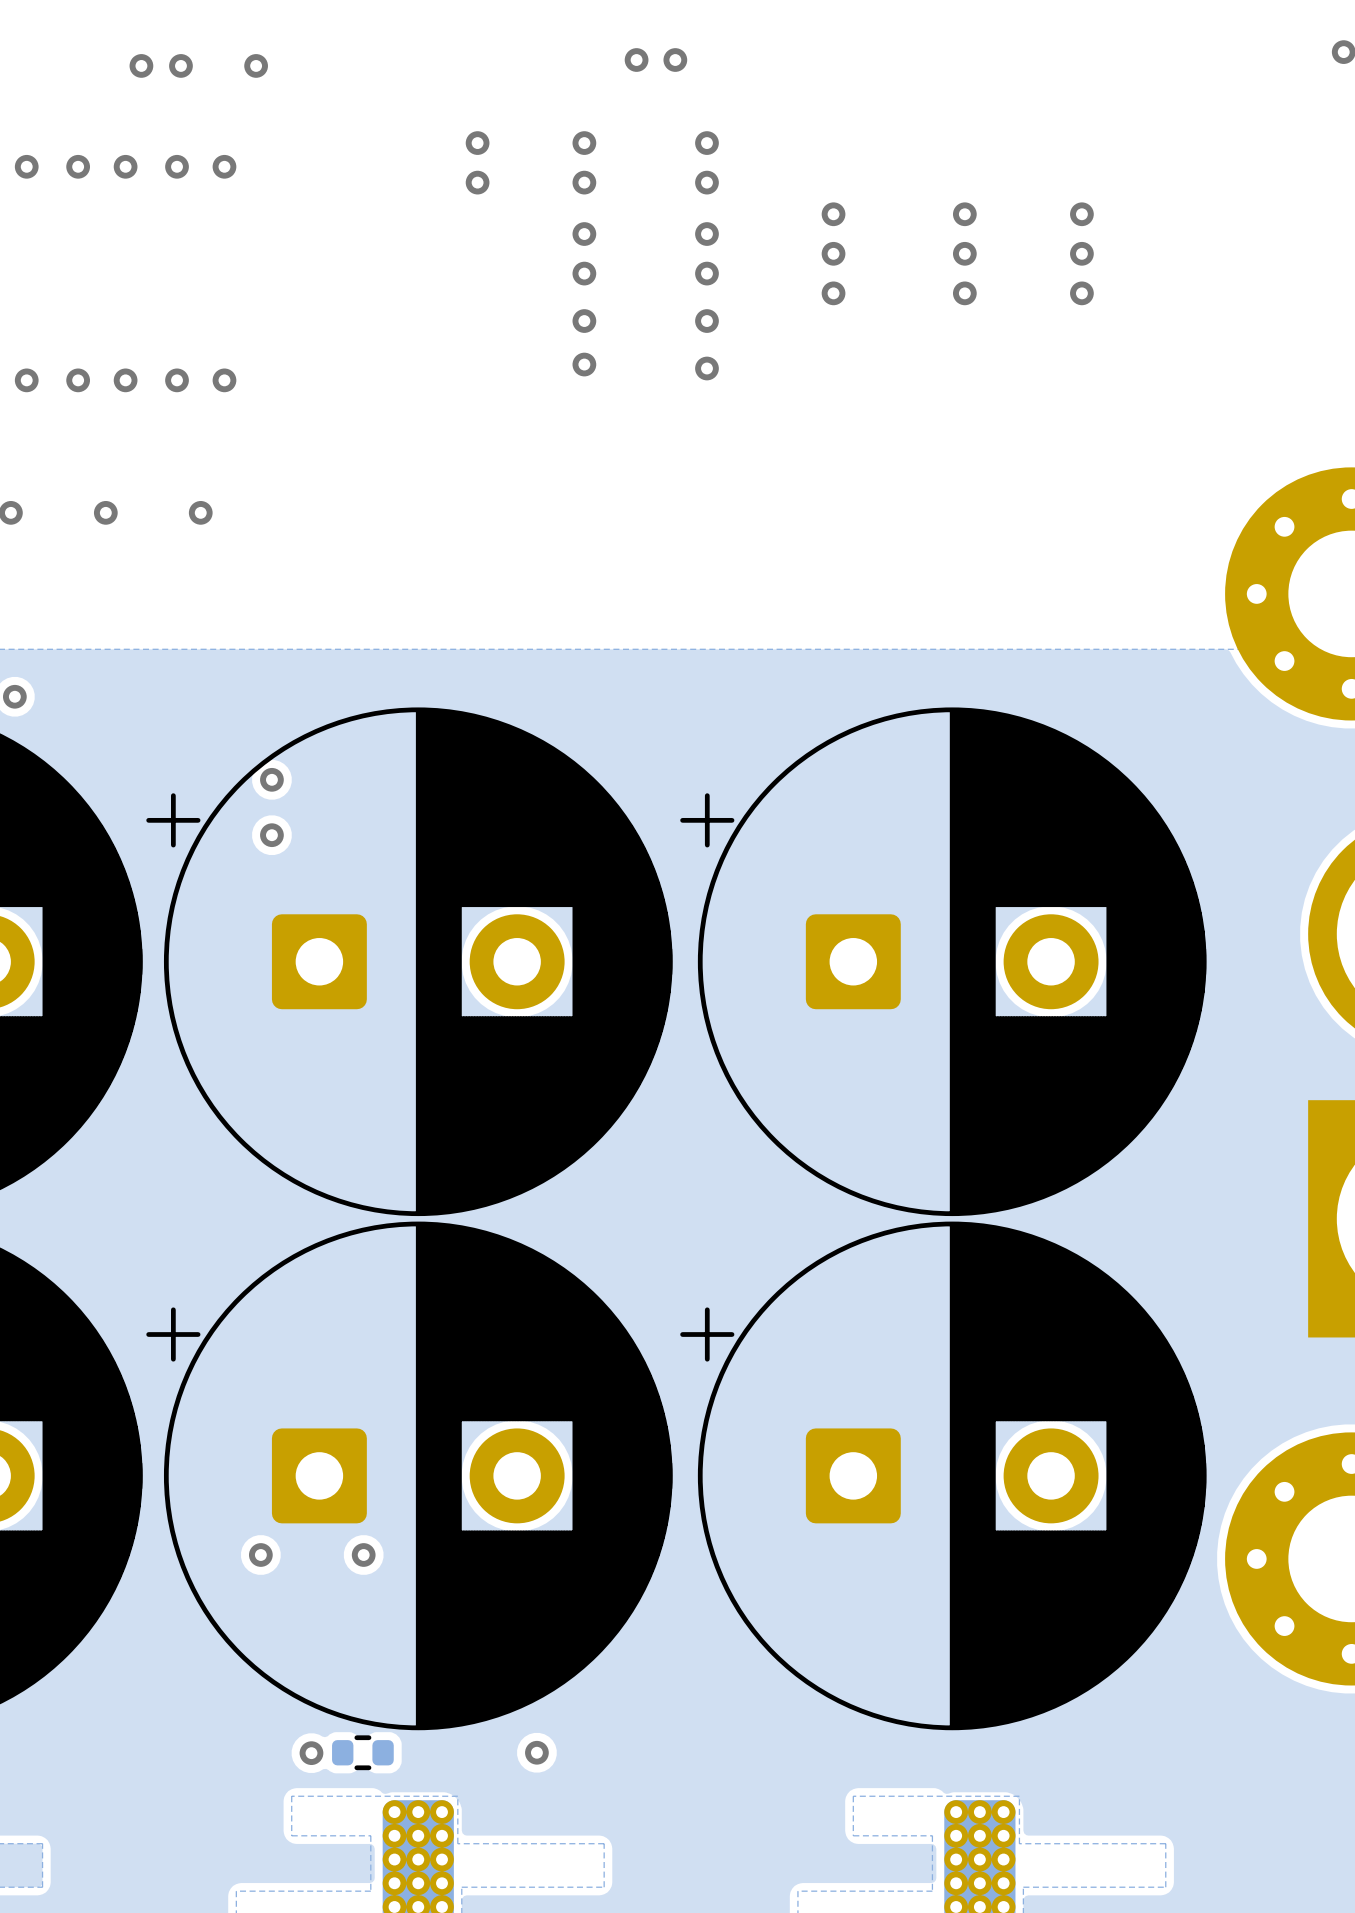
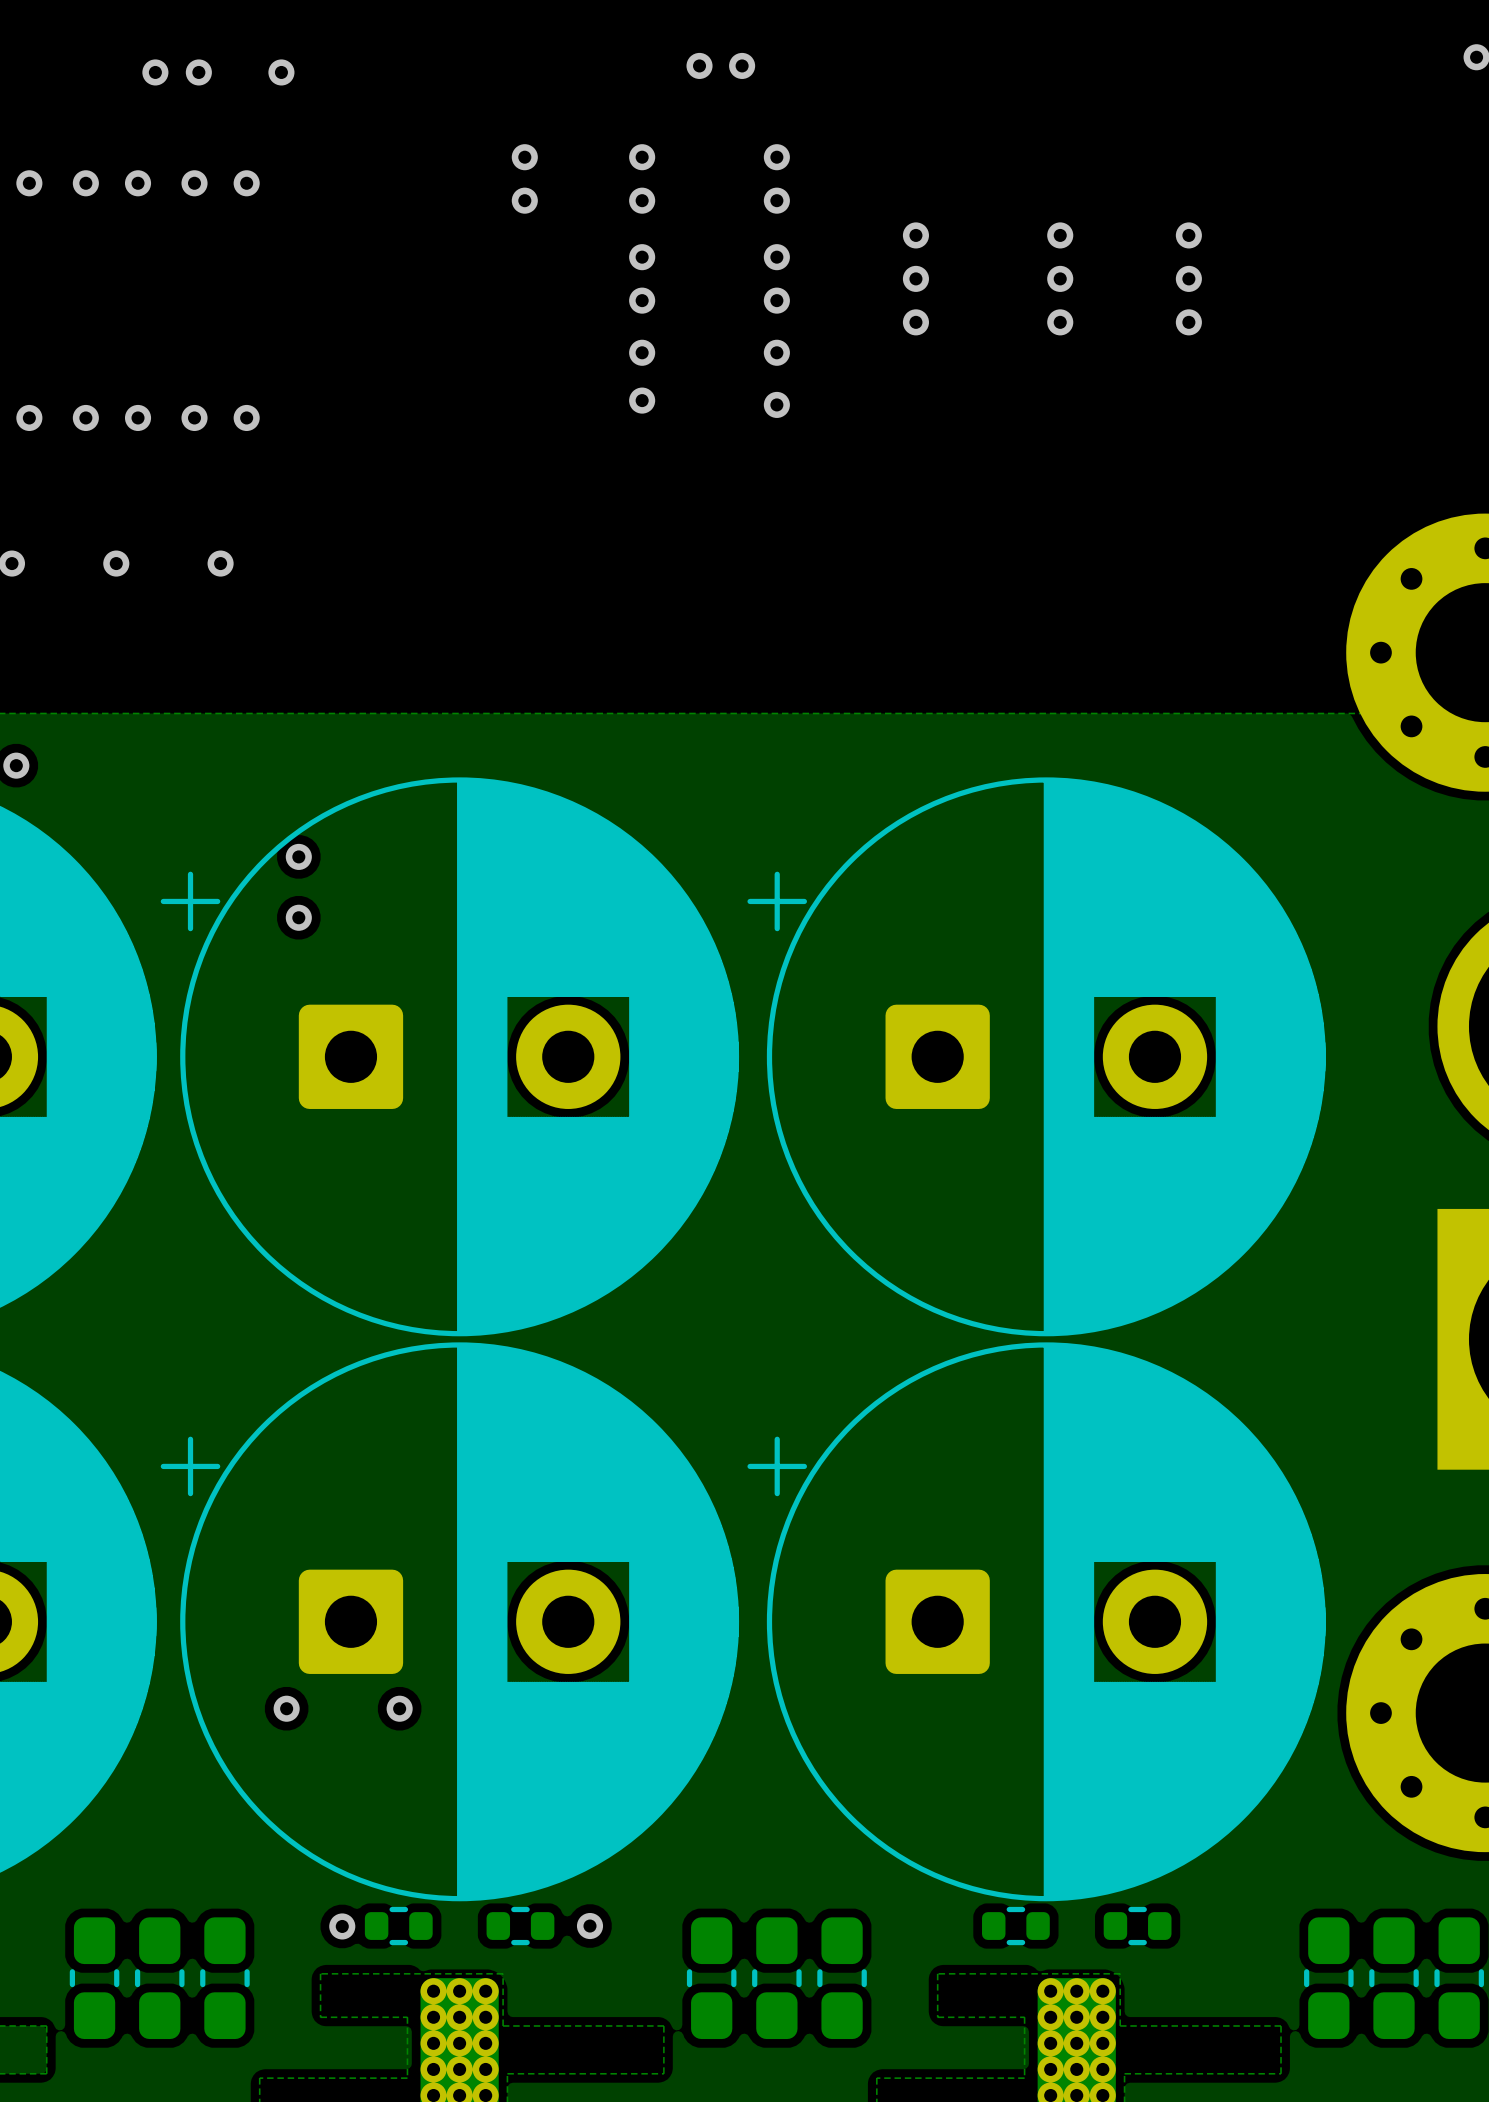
part: none -> (520, 1926)
part: none -> (1015, 1926)
part: none -> (1137, 1926)
part: none -> (94, 1978)
part: none -> (159, 1978)
part: none -> (224, 1978)
part: none -> (711, 1978)
part: none -> (776, 1978)
part: none -> (842, 1978)
part: none -> (1328, 1978)
part: none -> (1394, 1978)
part: none -> (1459, 1978)

